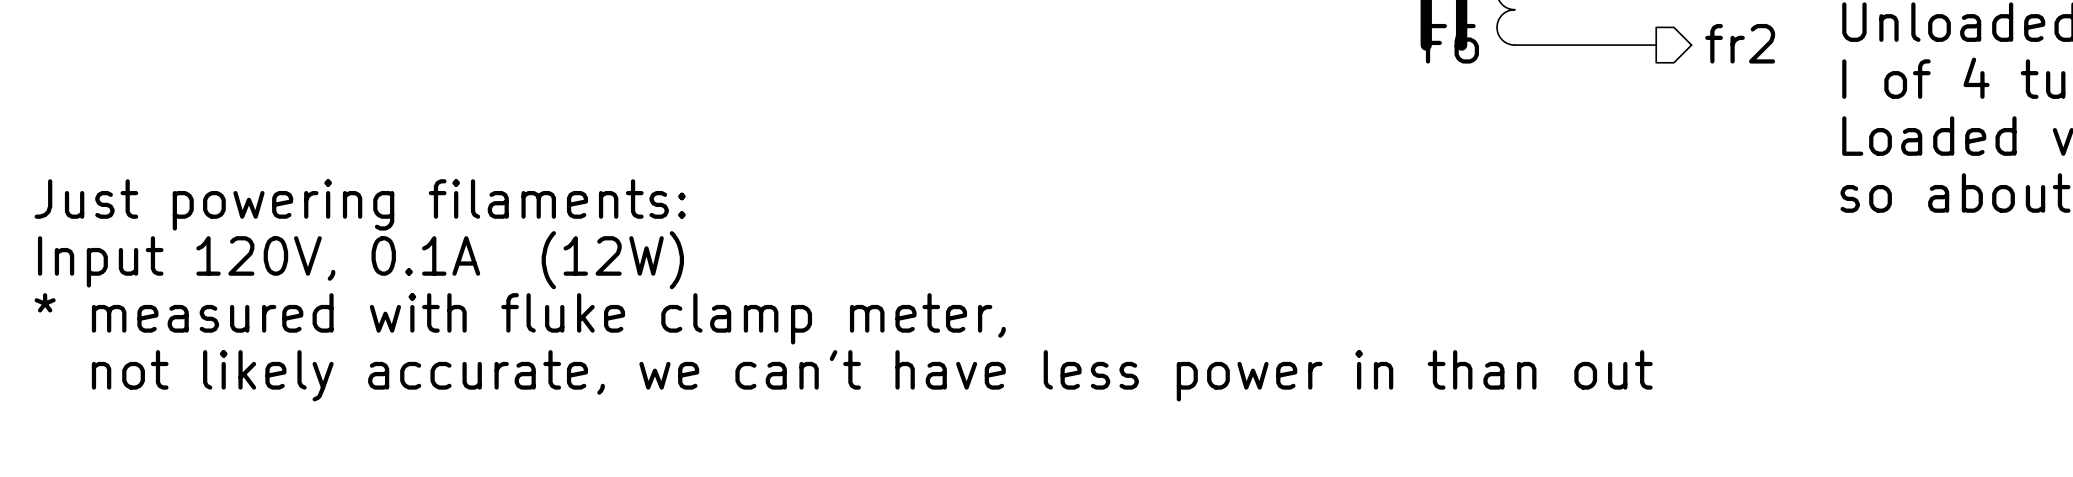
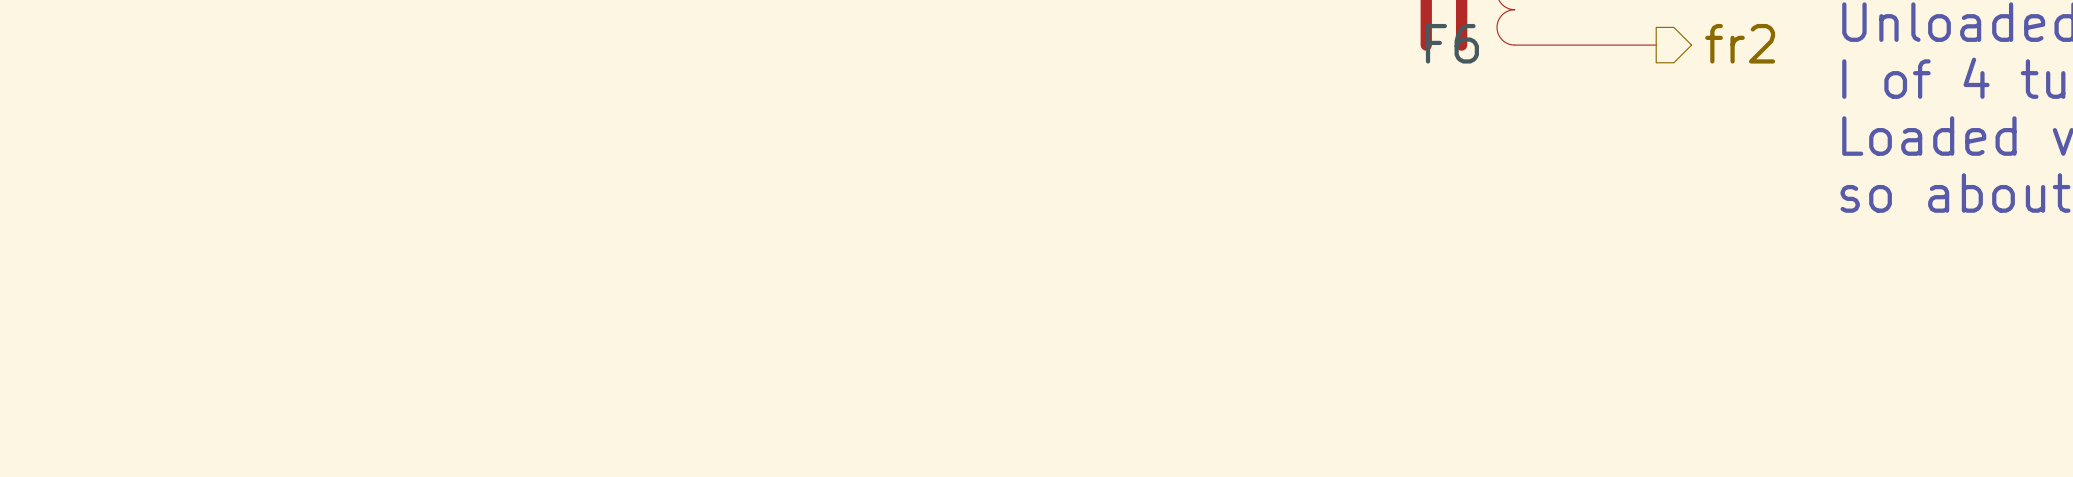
text: Just powering filaments: (360, 204) -> none
text: Input 120V, 0.1A (12W) (360, 260) -> none
text: * measured with fluke clamp meter, (520, 318) -> none
text: not likely accurate, we can't have less power in than out (872, 375) -> none

